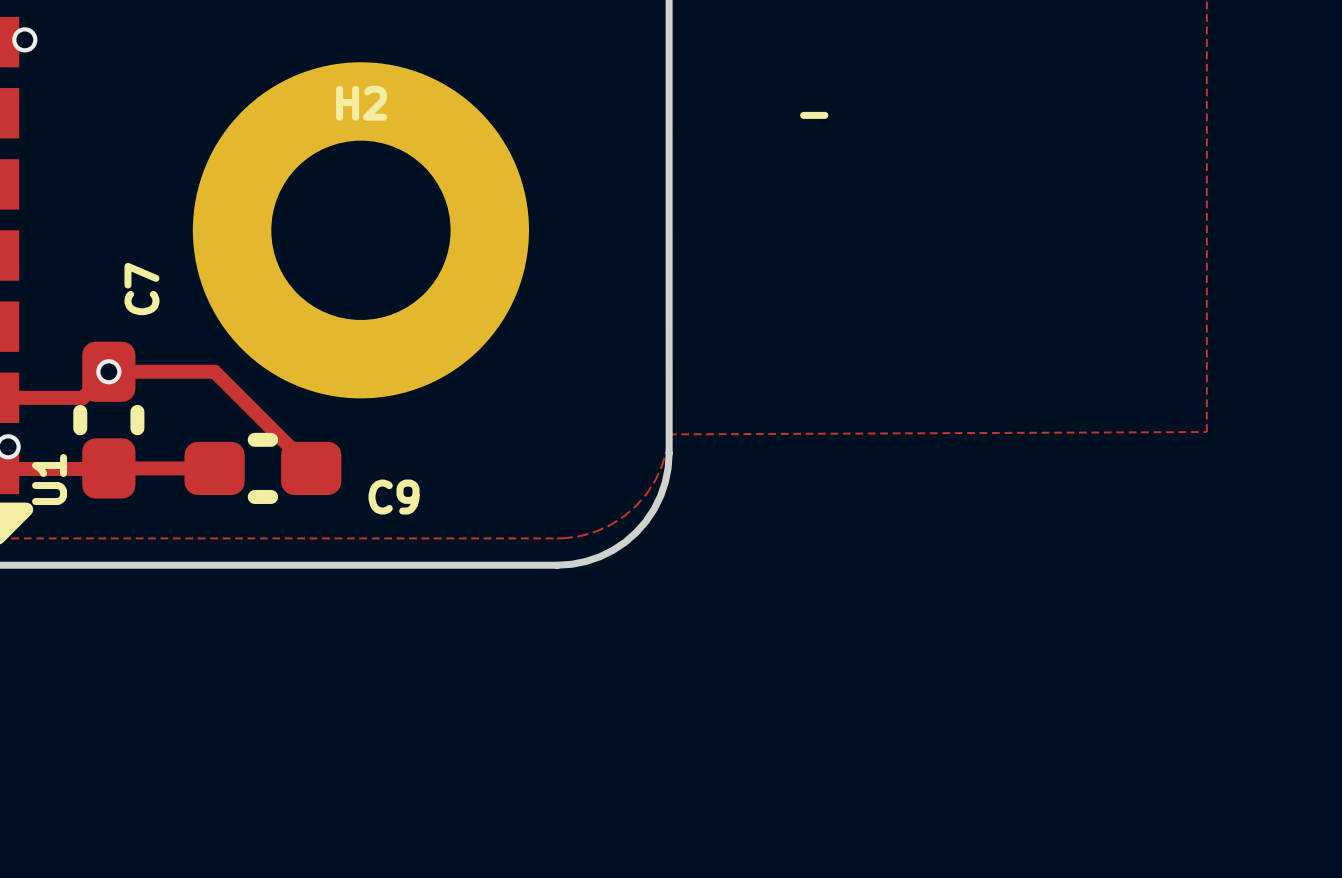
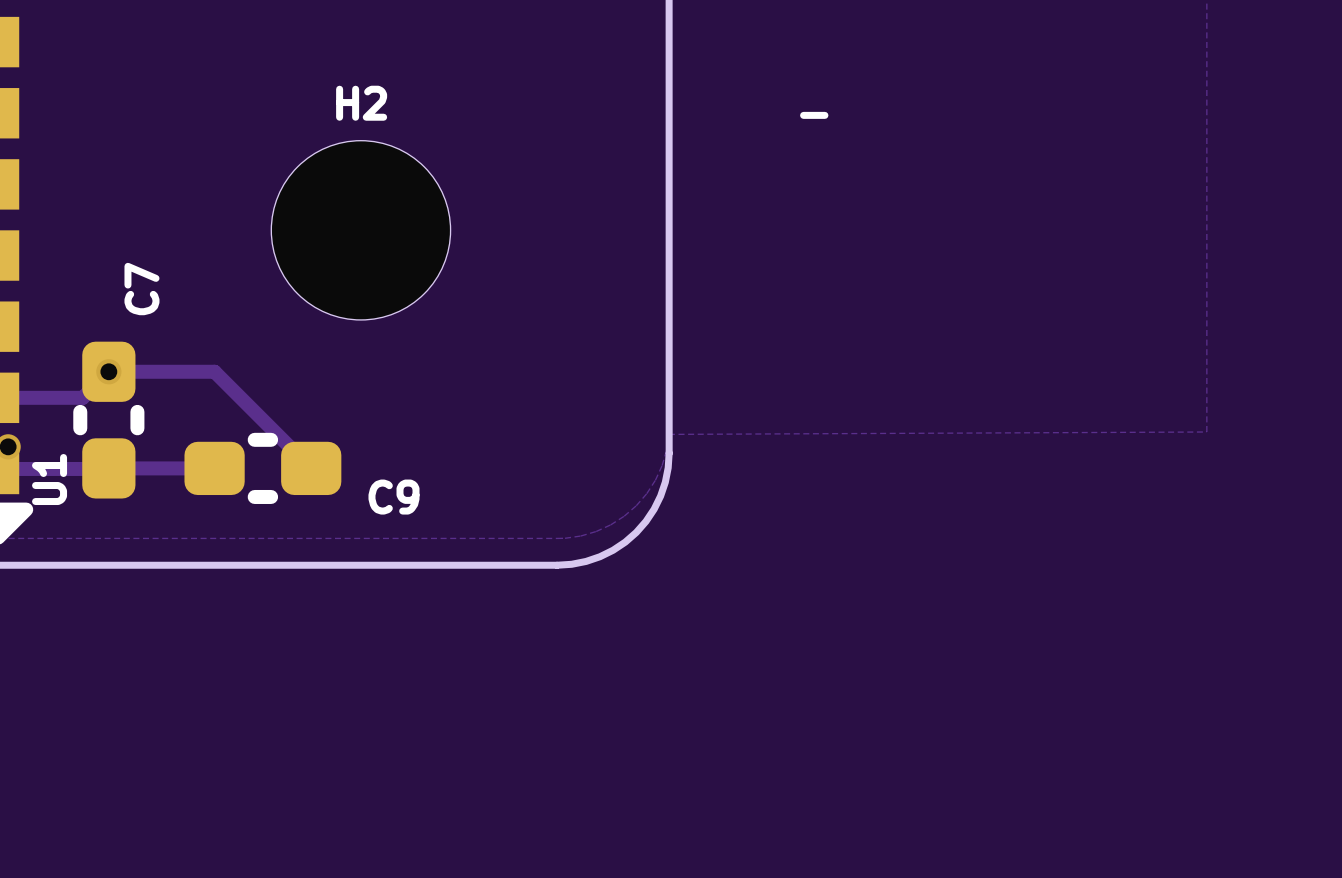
via: (24, 39) -> none
H2 footprint: [192, 62, 530, 399] -> [271, 140, 451, 320]

